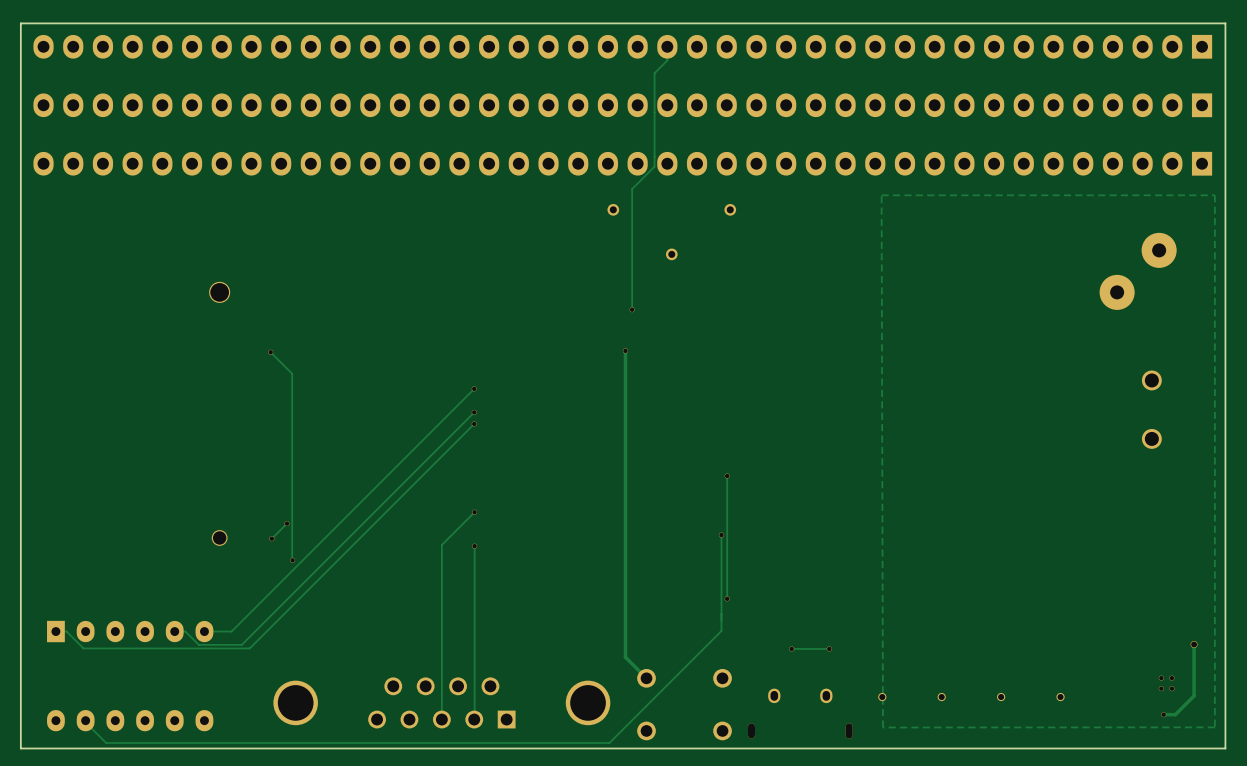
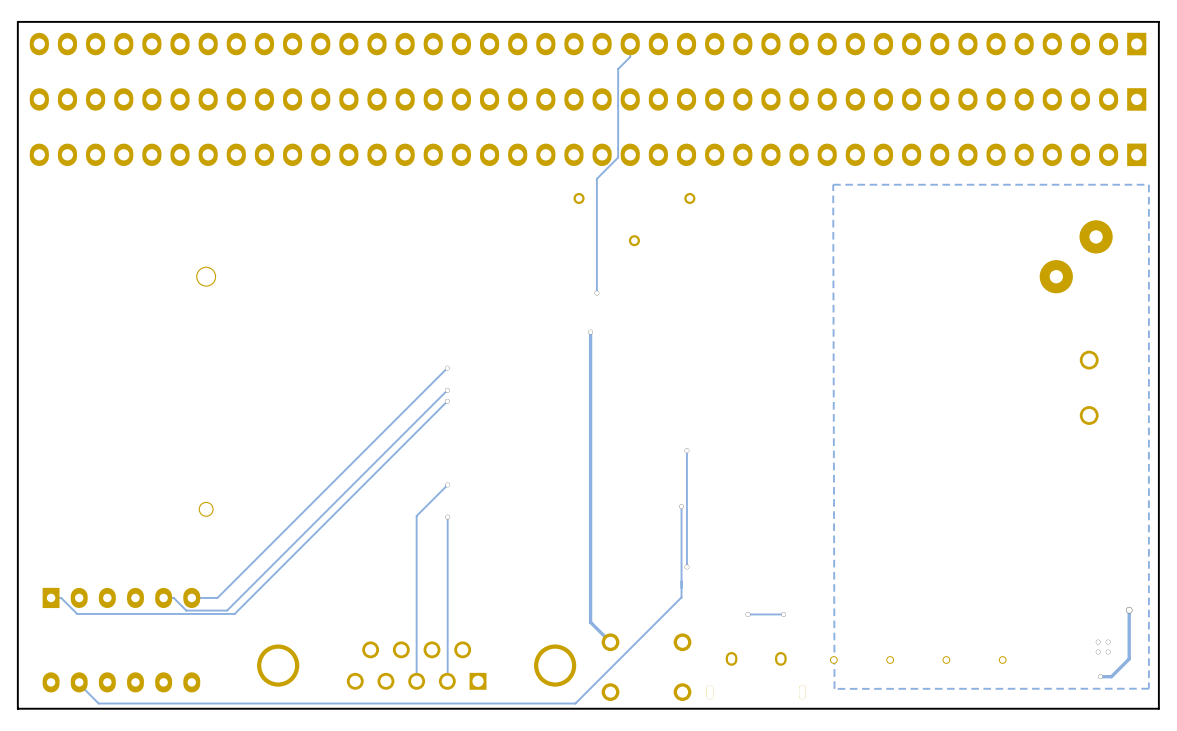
track: (270, 352) (292, 373) (292, 560) -> none
via: (270, 352) -> none
track: (286, 523) (271, 538) -> none
via: (286, 523) -> none
via: (271, 538) -> none
via: (292, 560) -> none

